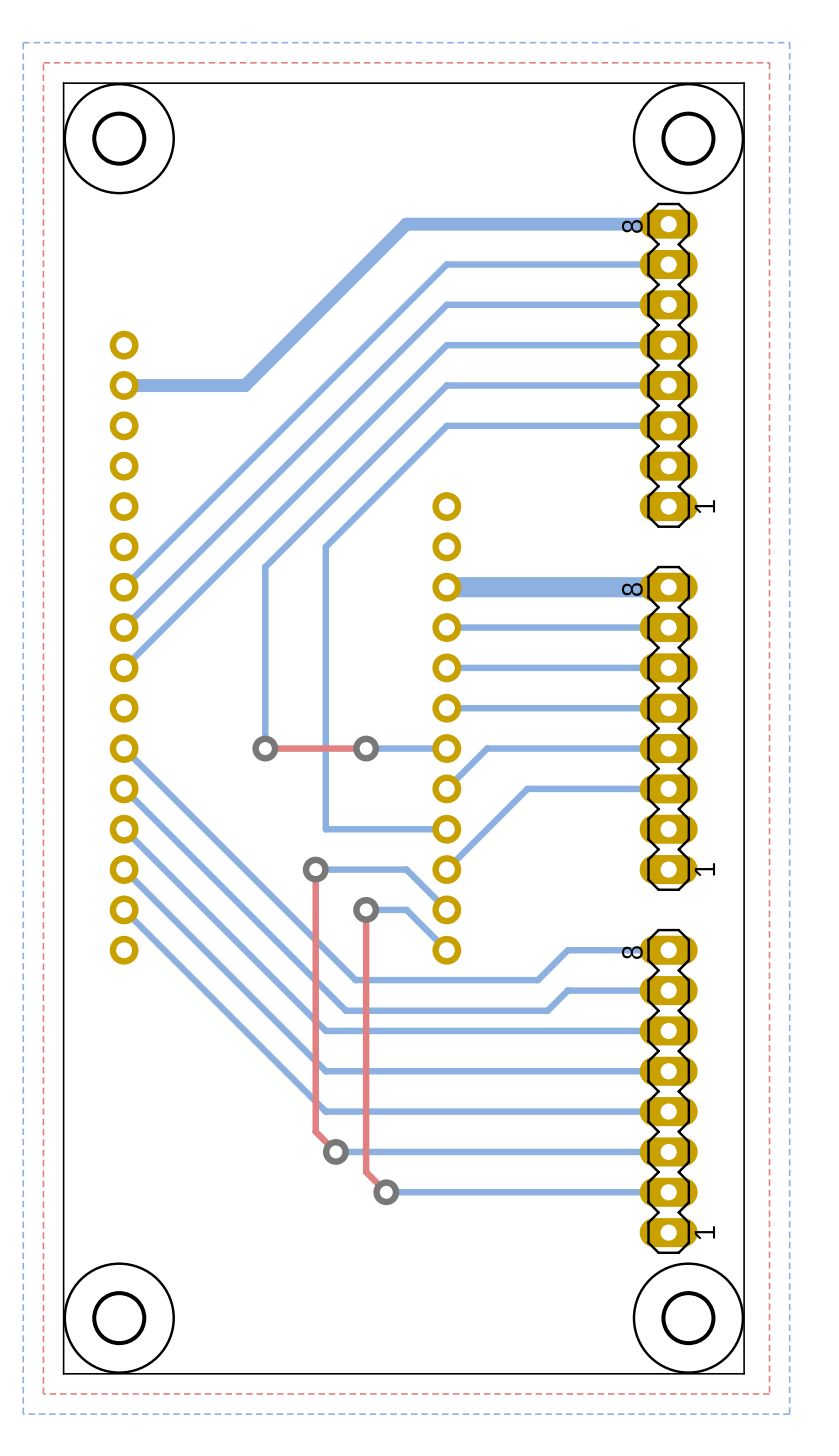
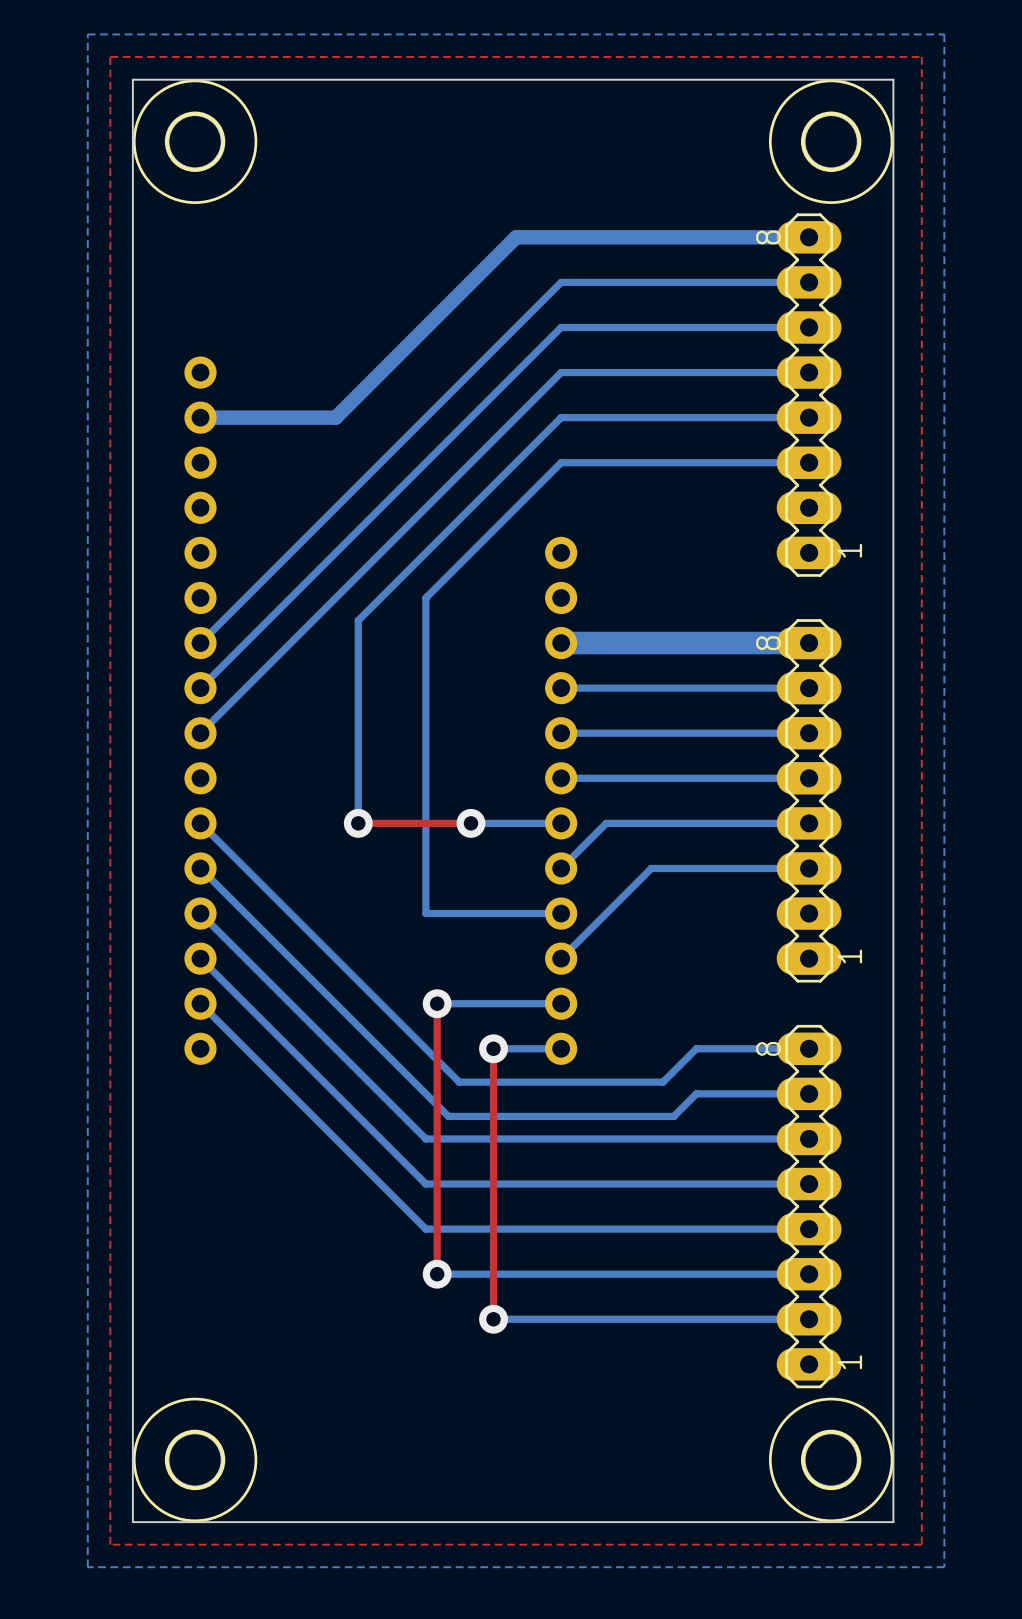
bottom track: (315, 869) (406, 869) (446, 909) -> none
top track: (315, 869) (315, 1131) (335, 1151) -> (437, 1003) (437, 1274)
via: (315, 869) -> none
bottom track: none -> (437, 1003) (470, 1003)
via: none -> (437, 1003)
top track: (366, 909) (366, 1172) (386, 1192) -> (493, 1048) (493, 1319)
via: (366, 909) -> none
bottom track: (406, 909) (446, 950) -> (516, 1003) (561, 1003)
bottom track: none -> (493, 1048) (561, 1048)
via: none -> (493, 1048)

